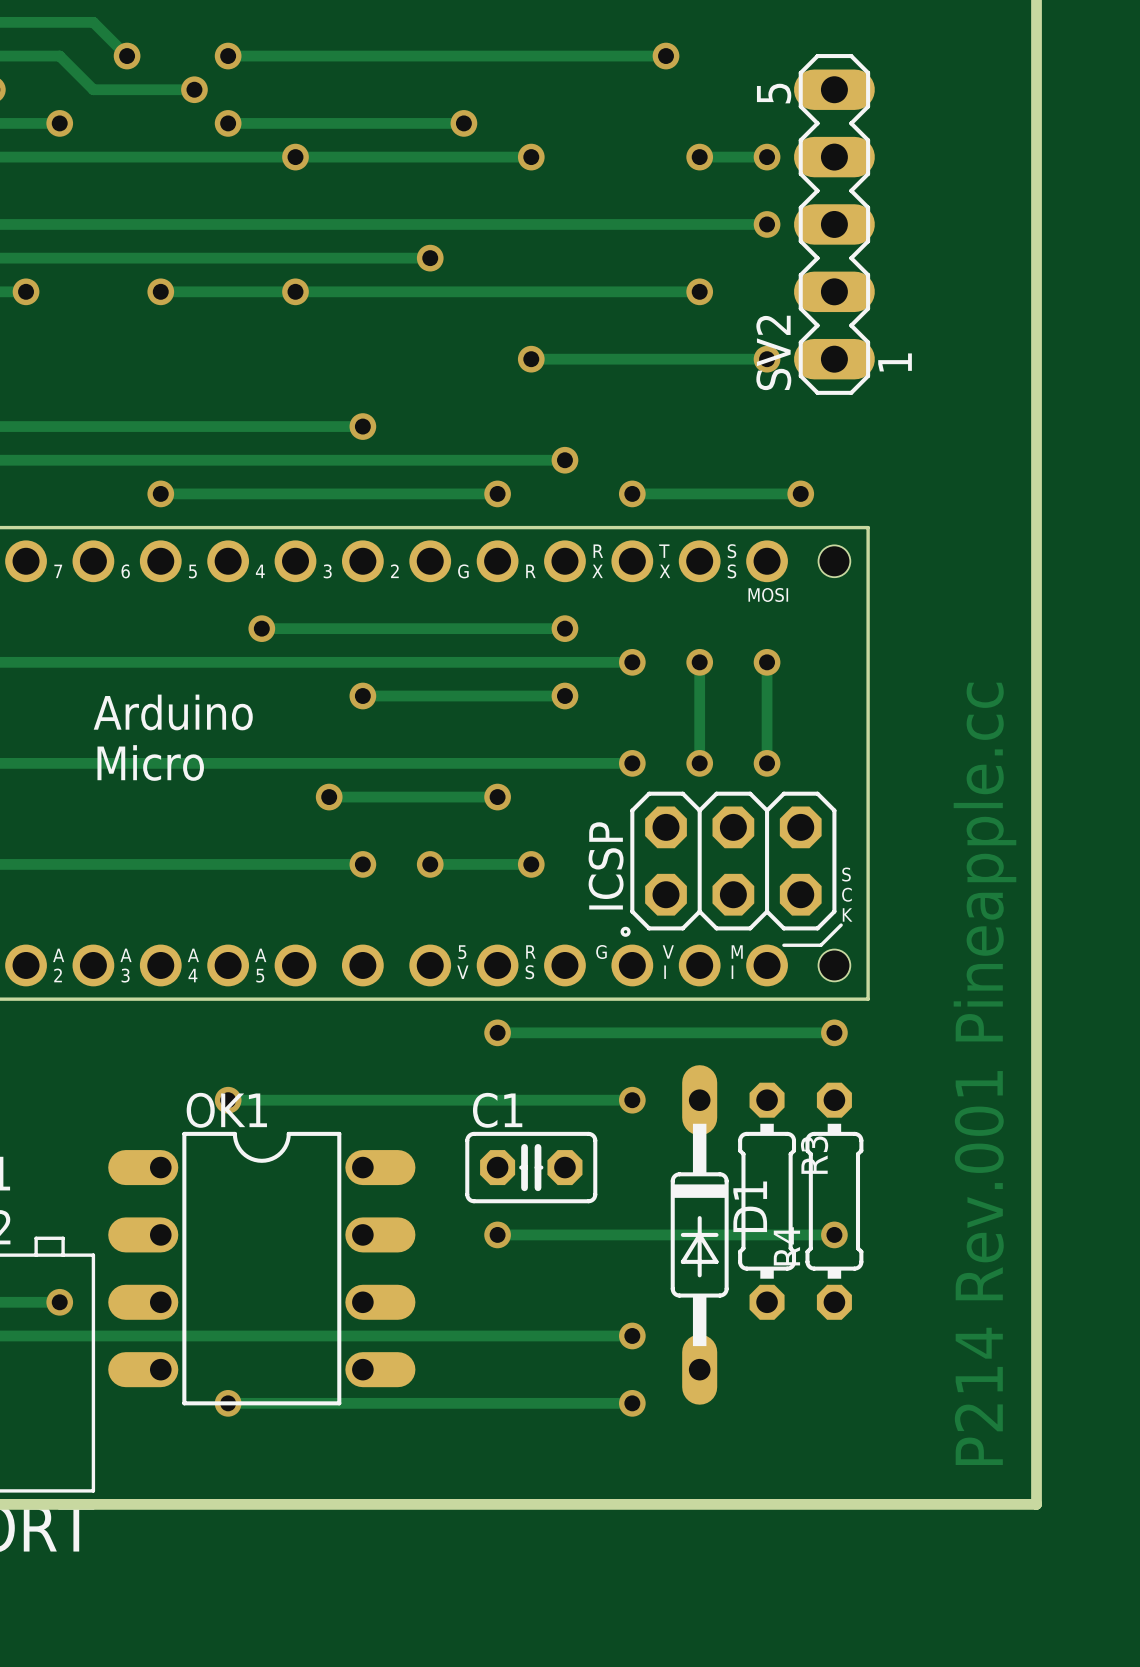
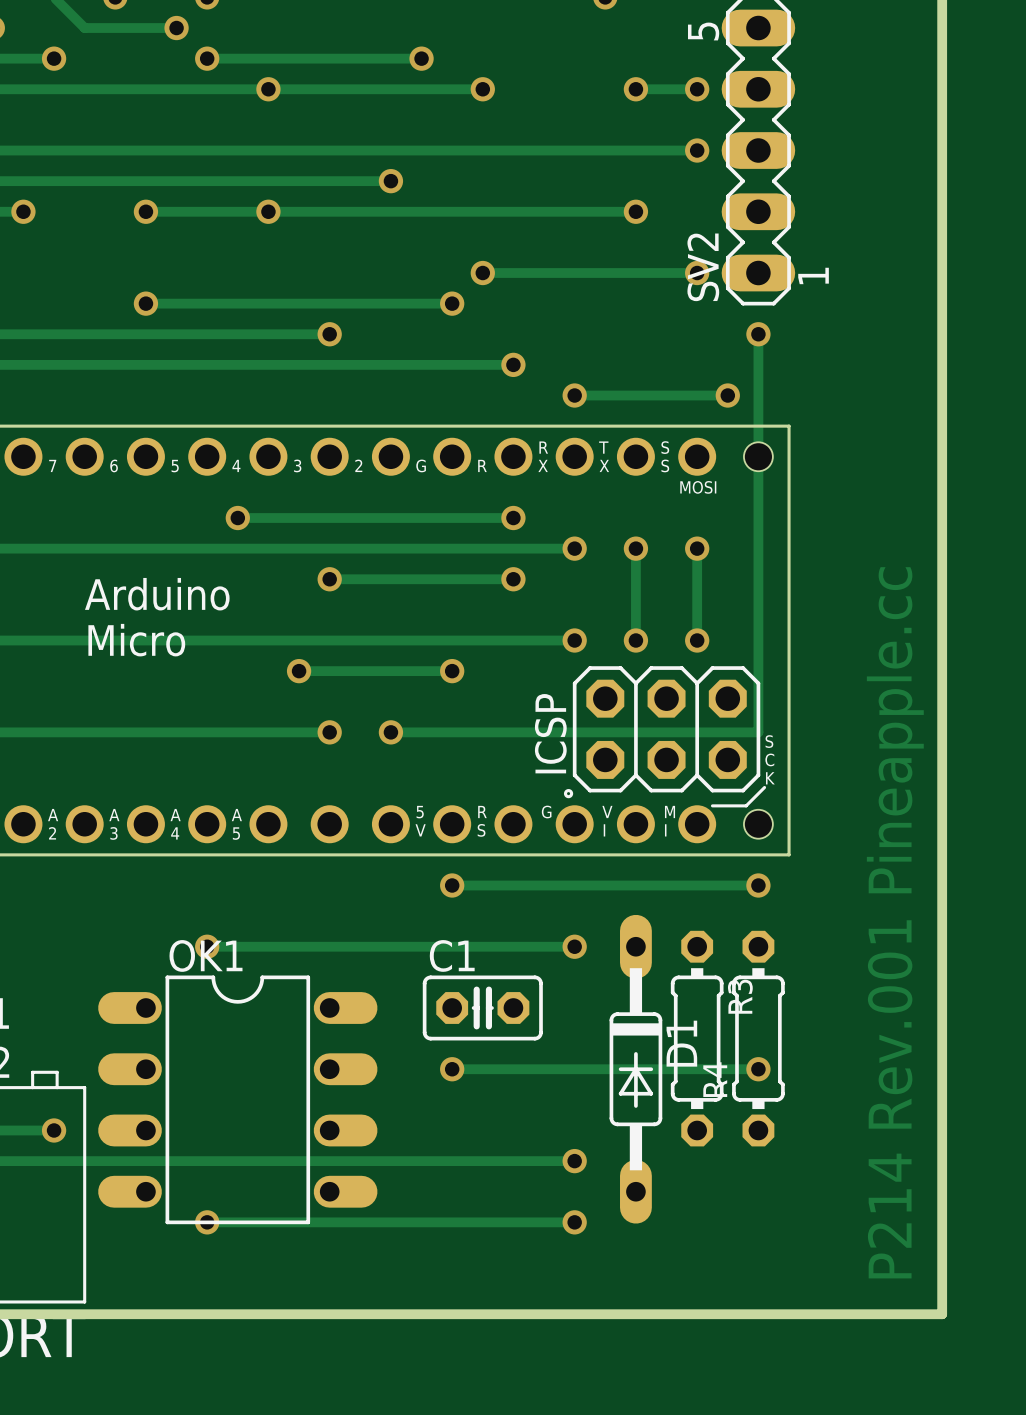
track: none -> (758, 334) (758, 732) (482, 732)
via: none -> (758, 334)
track: (160, 493) (497, 493) -> (145, 303) (452, 303)
via position: (160, 493) -> (145, 303)
via position: (497, 493) -> (452, 303)
via: (531, 864) -> none

